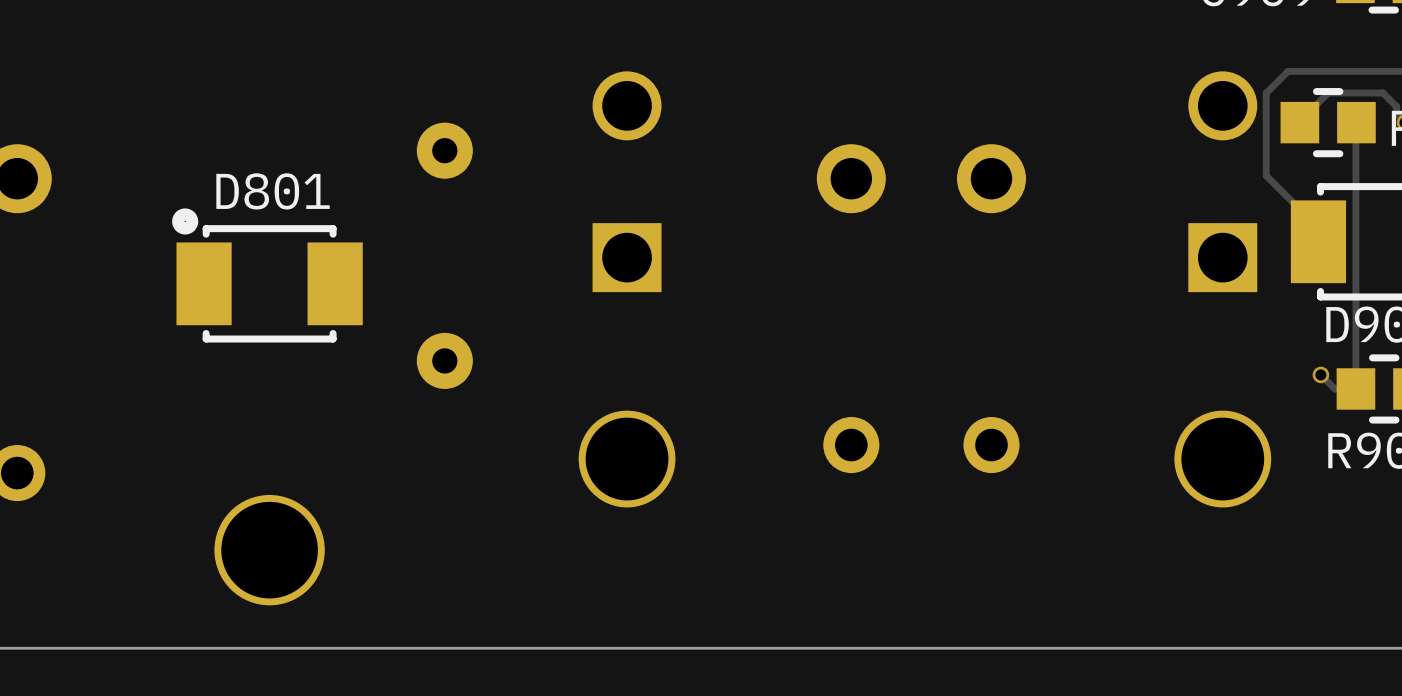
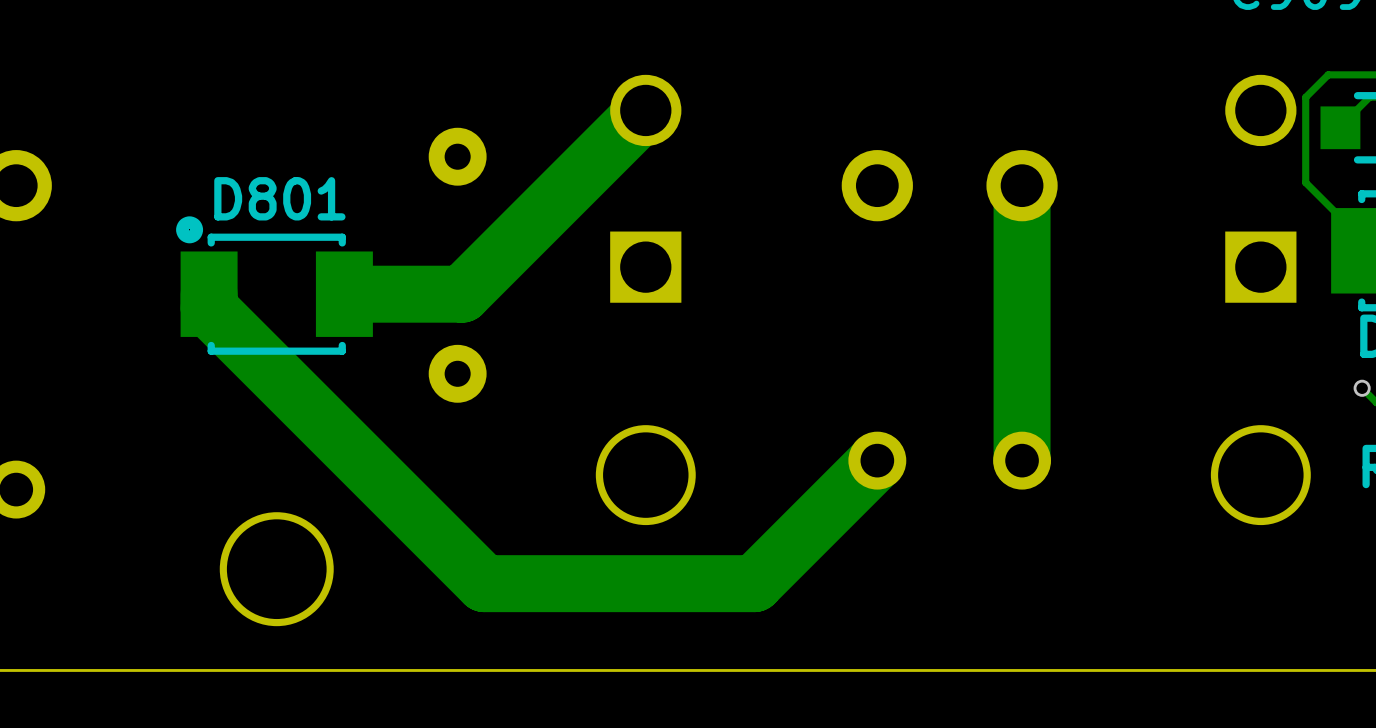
track: none -> (645, 110) (462, 294) (344, 294)
track: none -> (1022, 185) (1022, 460)
track: none -> (209, 294) (209, 308) (484, 583) (754, 583) (877, 460)

